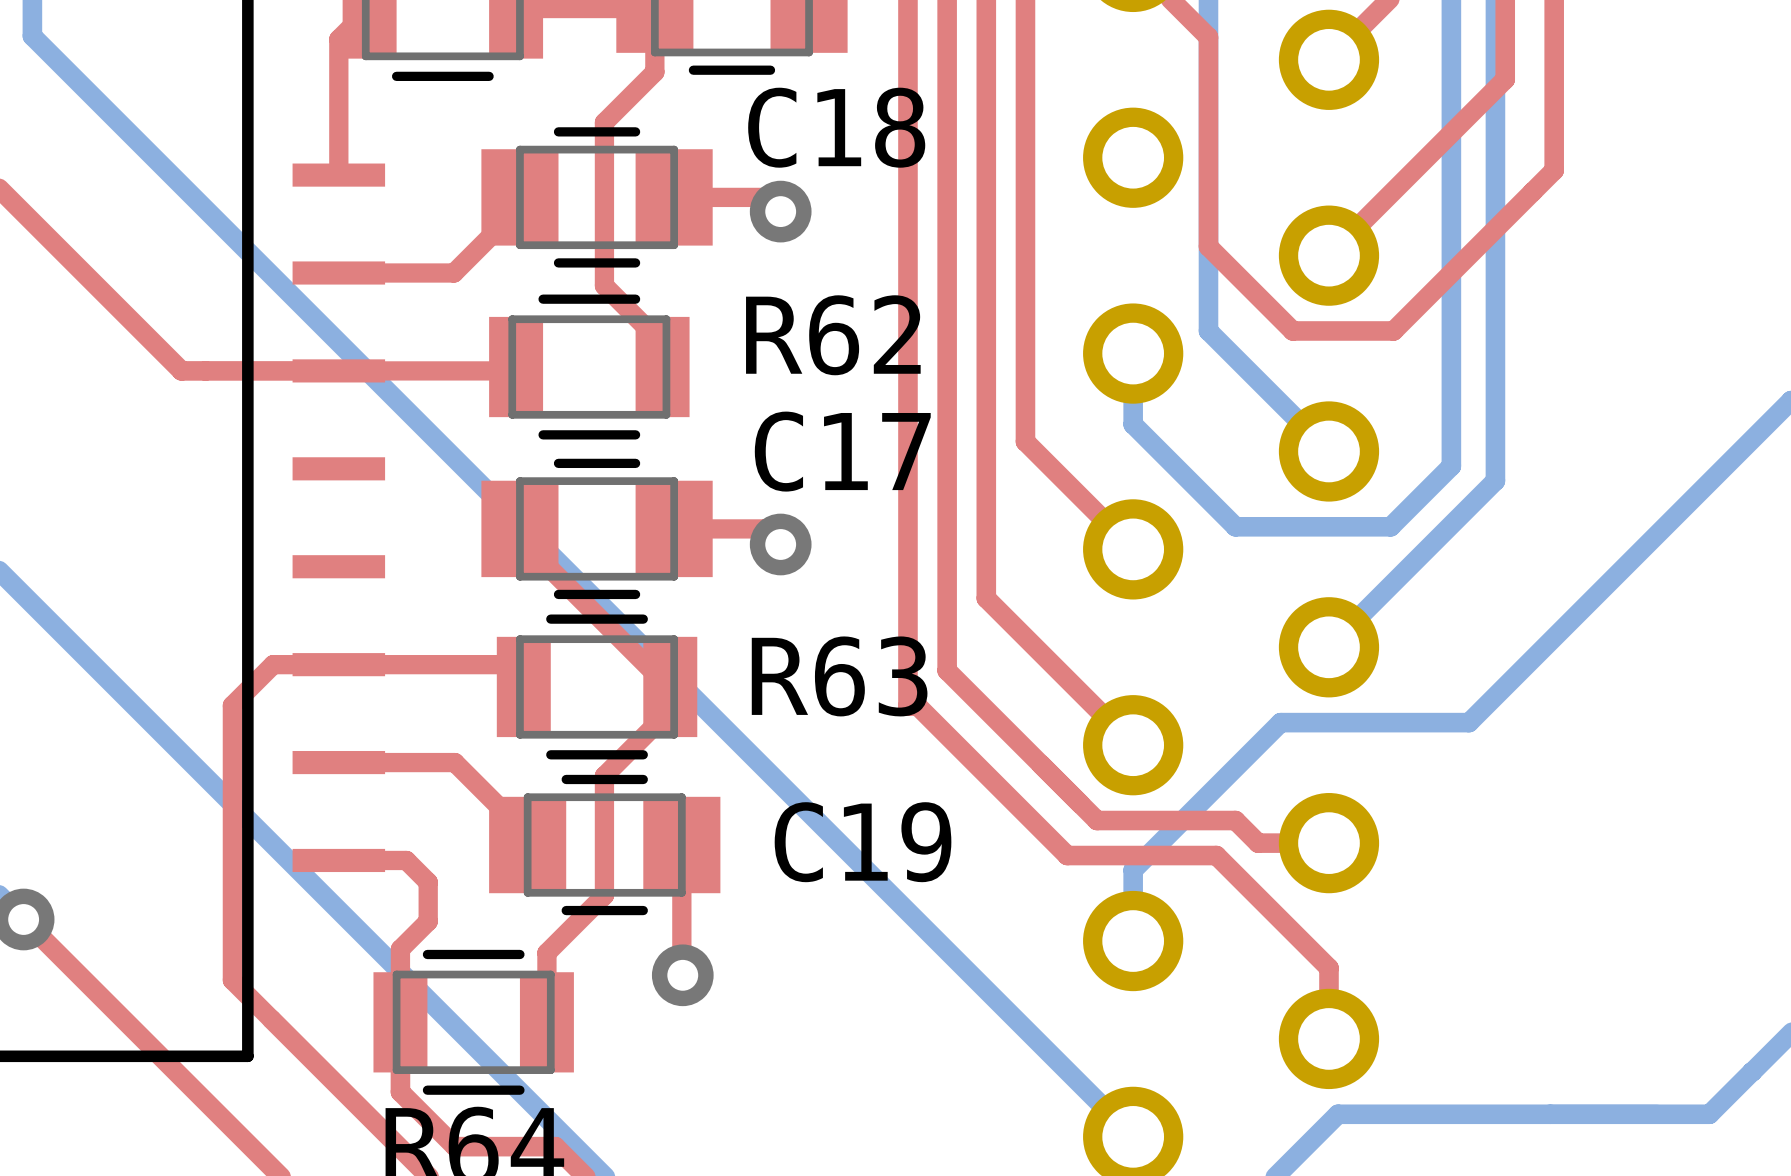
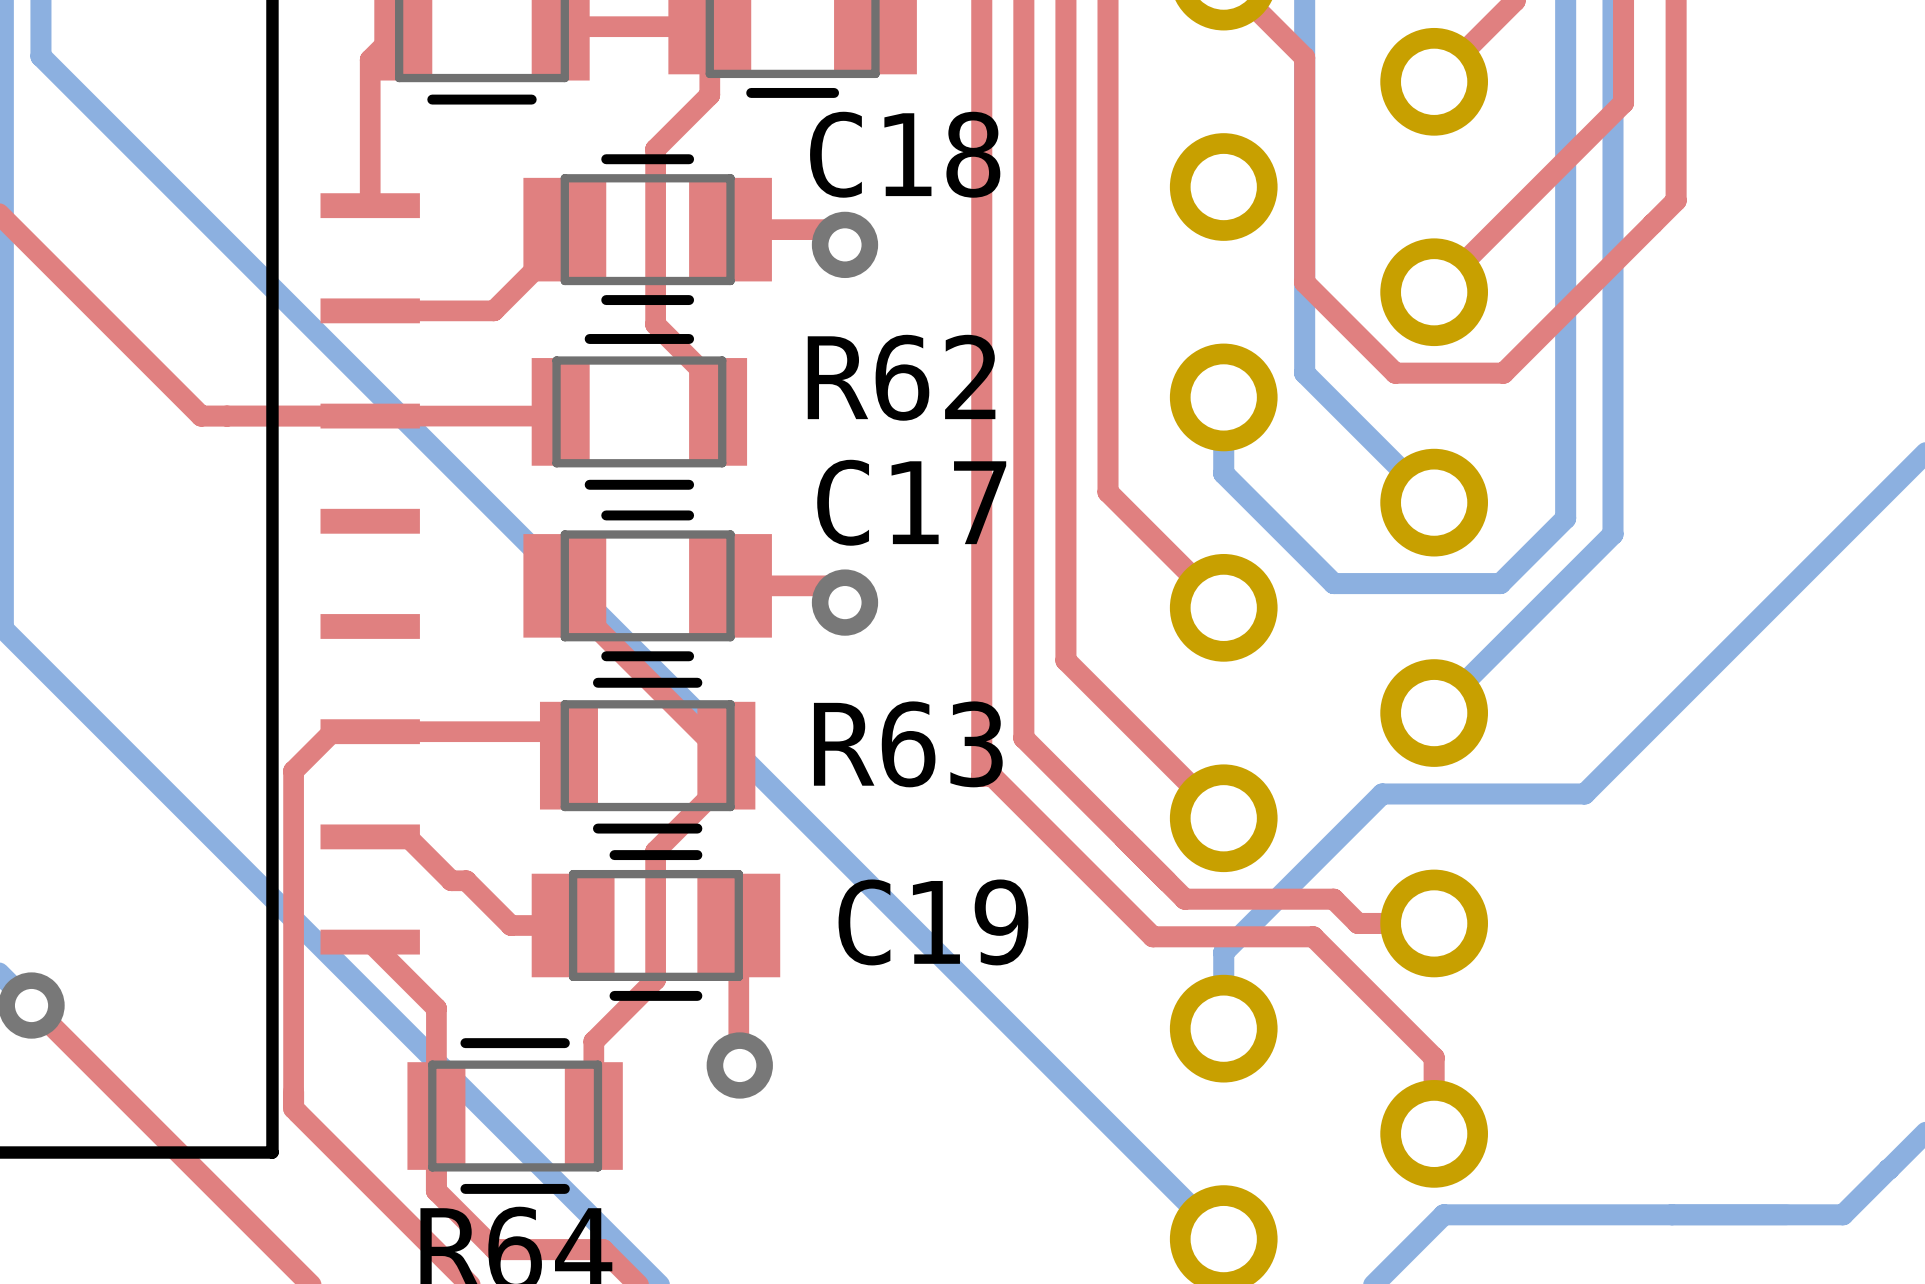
top track: (304, 664) (273, 664) (232, 705) (232, 980) (267, 1015) -> (332, 731) (293, 771) (293, 1104)
top track: (373, 762) (454, 762) (527, 835) (527, 845) -> (407, 836) (451, 880) (466, 880) (510, 925) (573, 925)
top track: (338, 860) (406, 860) (428, 882) (428, 921) (400, 949) -> (370, 942) (436, 1008) (436, 1037)

